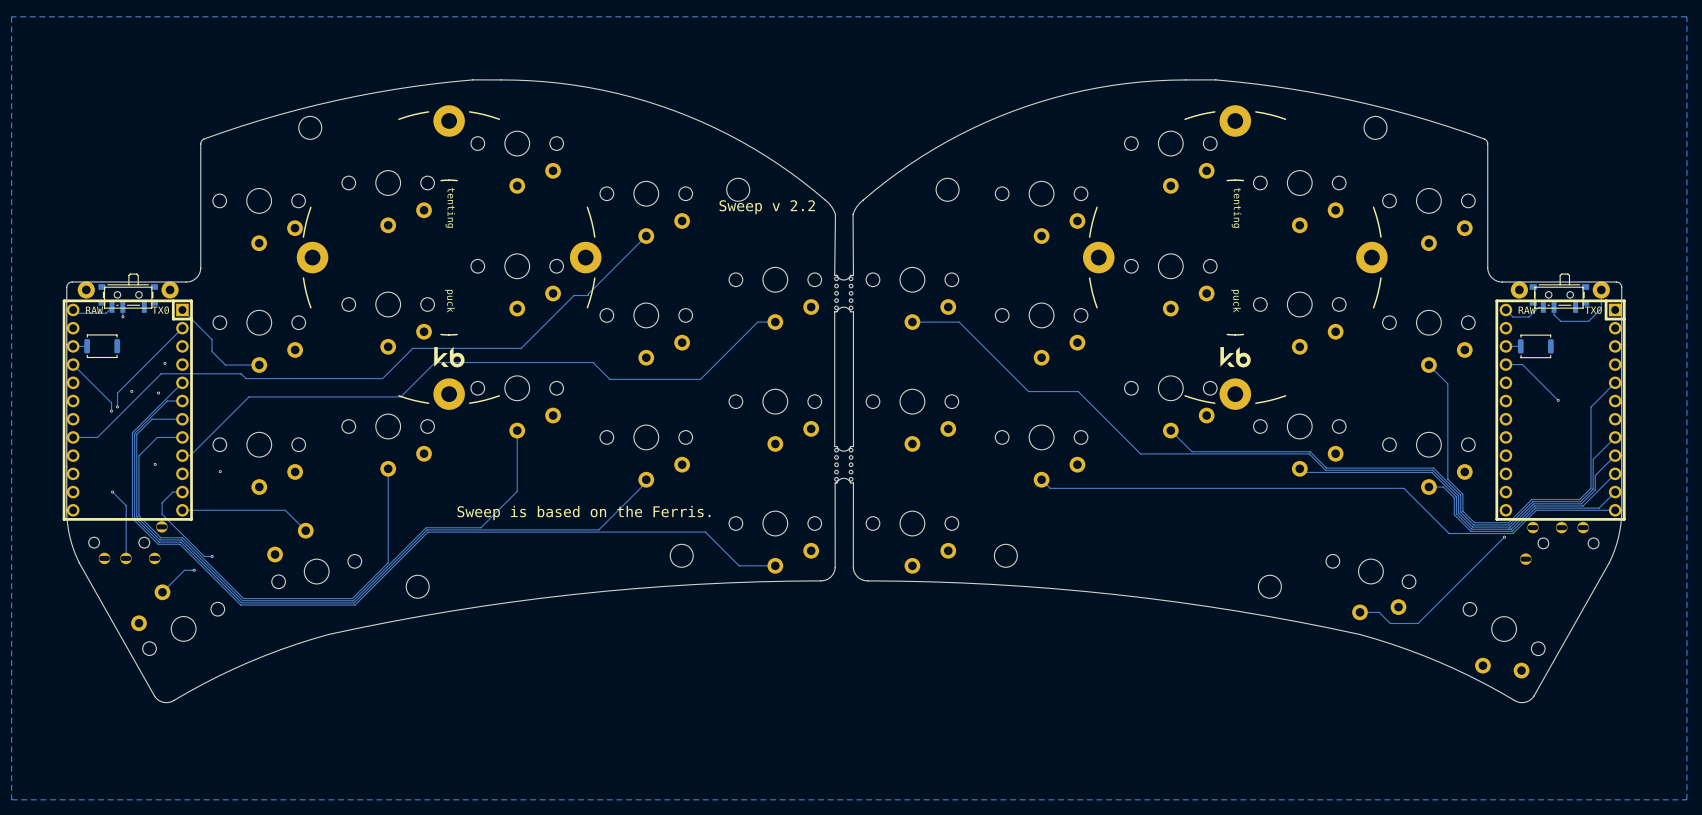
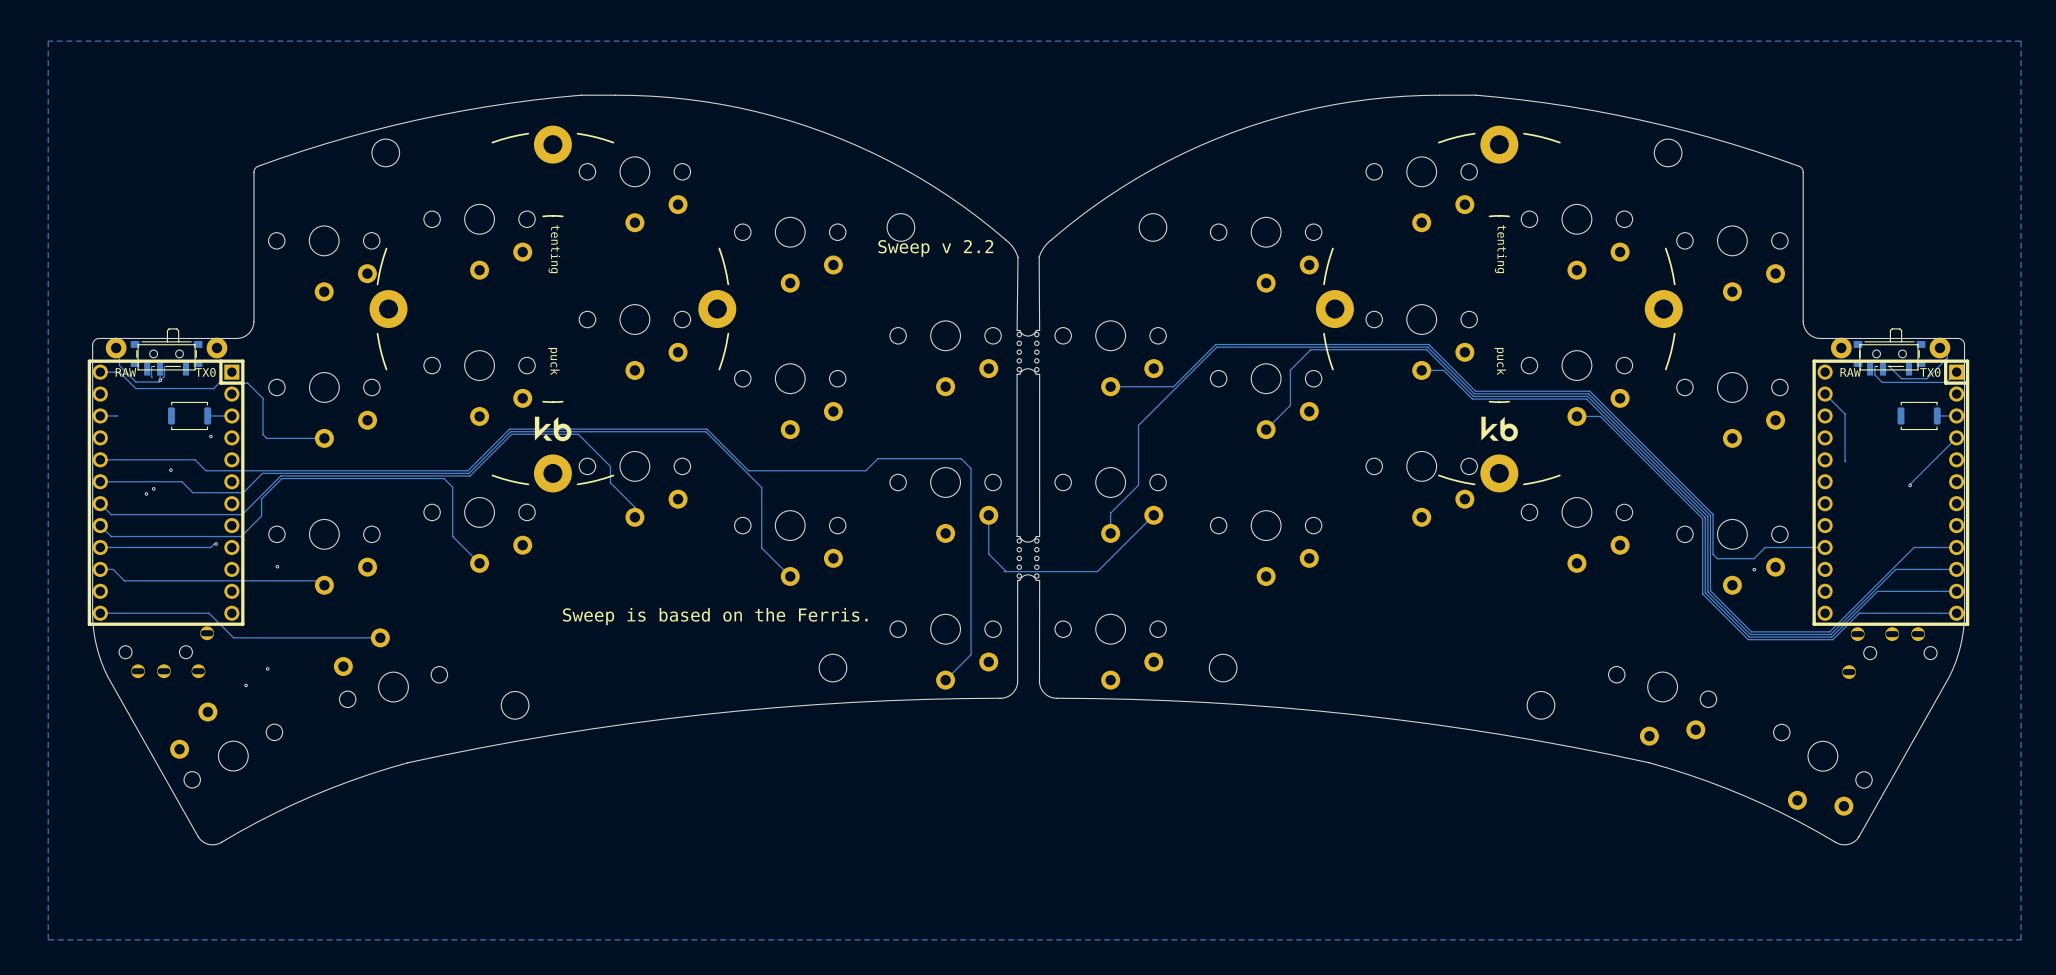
zone outline: (1686, 16) (11, 16) (11, 799) (1686, 799) (1686, 16) -> (2021, 41) (2021, 939) (48, 939) (48, 41) (2021, 41)
track: (646, 236) (588, 295) (574, 295) (521, 348) (412, 348) (382, 378) (245, 378) (241, 373) (161, 373) (97, 437) (73, 437) -> (452, 536) (452, 487) (443, 478) (281, 478) (261, 498) (261, 516) (241, 536) (111, 536) (100, 525)
track: none -> (119, 348) (119, 365) (135, 382) (158, 382) (164, 376) (164, 366)
track: (1601, 289) (1601, 308) (1588, 321) (1560, 321) (1554, 314) (1554, 307) -> none
track: none -> (1947, 348) (1947, 358) (1926, 378) (1901, 378) (1887, 366)
track: none -> (151, 366) (152, 377)
track: none -> (1874, 366) (1874, 375) (1882, 382) (1946, 382) (1956, 372)
track: (112, 307) (106, 313) (76, 313) (73, 309) -> none
track: (1543, 307) (1538, 307) (1529, 317) (1512, 317) (1505, 309) -> none
track: (182, 309) (212, 339) (212, 351) (225, 365) -> (100, 372) (119, 372) (135, 388) (213, 388) (219, 383) (247, 383) (263, 398) (263, 434) (266, 438) (283, 438)
track: (775, 322) (757, 322) (700, 379) (609, 379) (593, 362) (435, 362) (400, 396) (248, 396) (190, 455) (182, 455) -> none
track: (959, 322) (1028, 391) (1078, 391) (1140, 453) (1309, 453) (1325, 470) (1432, 470) (1458, 496) (1458, 512) (1472, 527) (1510, 527) (1533, 503) (1581, 503) (1595, 489) (1595, 475) (1615, 455) -> (1166, 386) (1173, 386) (1215, 344) (1428, 344) (1475, 391) (1589, 391) (1713, 514) (1713, 554) (1717, 558) (1754, 558) (1765, 547) (1825, 547)
track: (182, 328) (117, 393) (117, 406) -> none
track: none -> (1825, 394) (1845, 413) (1845, 462)
part position: (102, 346) -> (189, 415)
track: none -> (231, 415) (207, 415)
track: (1520, 346) (1505, 346) -> none
part position: (1535, 346) -> (1919, 415)
track: none -> (1956, 415) (1937, 415)
track: (73, 364) (111, 403) (111, 411) -> none
track: (1505, 364) (1522, 364) (1558, 400) -> none
track: none -> (1956, 437) (1910, 485)
track: (1428, 365) (1447, 383) (1447, 479) (1462, 494) (1462, 511) (1474, 522) (1508, 522) (1531, 499) (1579, 499) (1591, 488) (1591, 406) (1615, 382) -> none
track: (182, 382) (132, 432) (132, 518) (158, 544) (179, 544) (240, 605) (355, 605) (428, 532) (705, 532) (739, 565) (775, 565) -> (100, 459) (195, 459) (206, 470) (467, 470) (509, 429) (706, 429) (748, 470) (865, 470) (877, 458) (961, 458) (971, 468) (971, 654) (945, 680)
via: (158, 393) -> none
via position: (1558, 400) -> (1910, 485)
track: (182, 401) (167, 401) (134, 433) (134, 517) (159, 542) (180, 542) (241, 602) (354, 602) (427, 529) (598, 529) (646, 482) (646, 479) -> (100, 481) (181, 481) (192, 492) (243, 492) (262, 473) (469, 473) (510, 431) (705, 431) (761, 487) (761, 547) (790, 576)
track: (182, 419) (152, 419) (136, 434) (136, 516) (160, 539) (181, 539) (242, 600) (353, 600) (426, 527) (480, 527) (517, 491) (517, 430) -> (100, 503) (111, 514) (242, 514) (280, 475) (470, 475) (511, 434) (578, 434) (610, 466) (610, 482) (634, 507) (634, 517)
track: none -> (988, 515) (988, 554) (1006, 571)
track: none -> (1153, 515) (1097, 571) (1004, 571)
track: (1170, 430) (1192, 451) (1310, 451) (1326, 468) (1433, 468) (1460, 495) (1460, 512) (1473, 524) (1509, 524) (1532, 501) (1580, 501) (1593, 489) (1593, 459) (1615, 437) -> none
track: (182, 437) (157, 437) (138, 455) (138, 515) (160, 537) (182, 537) (243, 598) (352, 598) (388, 562) (388, 468) -> (452, 536) (479, 563)
track: none -> (1110, 533) (1110, 513) (1138, 485) (1138, 425) (1216, 347) (1427, 347) (1474, 393) (1588, 393) (1710, 515) (1710, 590) (1751, 631) (1829, 631) (1914, 547) (1956, 547)
track: none -> (216, 543) (210, 547) (100, 547)
via position: (155, 464) -> (216, 543)
track: (1299, 468) (1303, 472) (1431, 472) (1456, 496) (1456, 513) (1471, 529) (1511, 529) (1534, 505) (1583, 505) (1615, 473) -> (1266, 429) (1290, 405) (1290, 370) (1310, 349) (1426, 349) (1473, 396) (1587, 396) (1707, 516) (1707, 591) (1750, 634) (1830, 634) (1895, 569) (1956, 569)
track: none -> (100, 569) (113, 569) (124, 580) (319, 580) (324, 585)
via: none -> (1754, 569)
track: (1041, 479) (1050, 488) (1403, 488) (1449, 533) (1513, 533) (1536, 510) -> (1576, 416) (1600, 416) (1702, 518) (1702, 593) (1748, 639) (1832, 639) (1859, 613) (1861, 613)
track: (1428, 487) (1443, 487) (1454, 497) (1454, 514) (1470, 531) (1512, 531) (1535, 508) (1599, 508) (1615, 492) -> (1421, 370) (1443, 370) (1472, 399) (1586, 399) (1705, 517) (1705, 592) (1749, 637) (1831, 637) (1877, 591) (1956, 591)
track: (112, 492) (126, 505) (126, 558) -> none
via: (112, 492) -> none
track: (182, 492) (172, 492) (162, 502) (162, 514) (204, 556) (212, 556) -> none
track: (182, 510) (285, 510) (305, 530) -> (100, 613) (209, 613) (233, 637) (380, 637)
track: (1504, 537) (1418, 623) (1390, 623) (1379, 612) (1359, 612) -> none
via: (1504, 537) -> none
track: (194, 570) (184, 570) (162, 592) -> none

